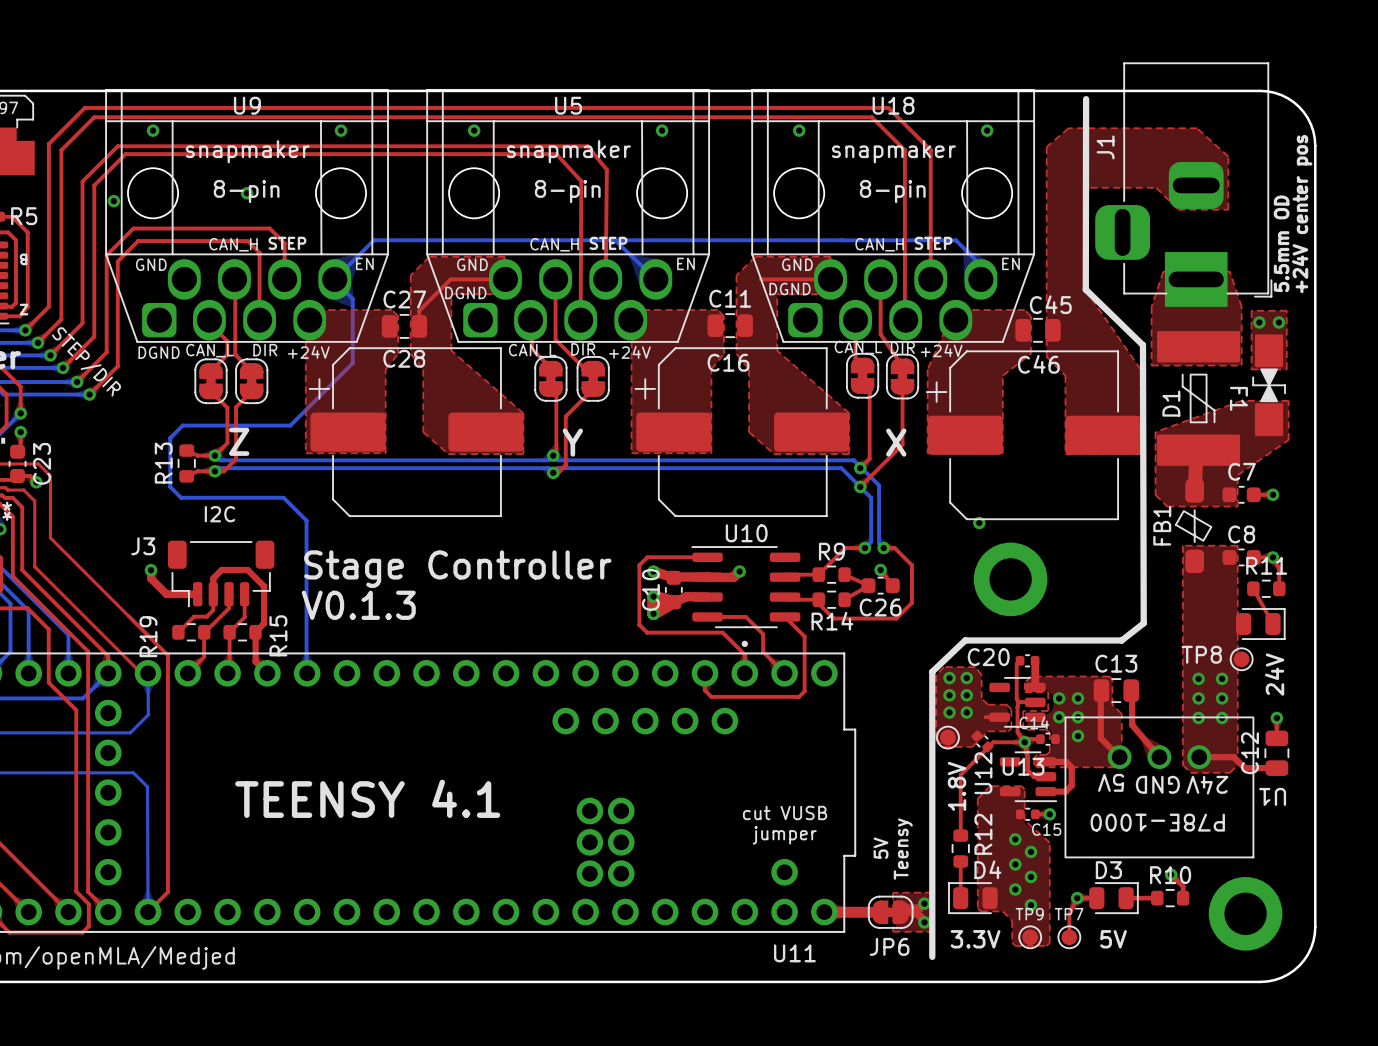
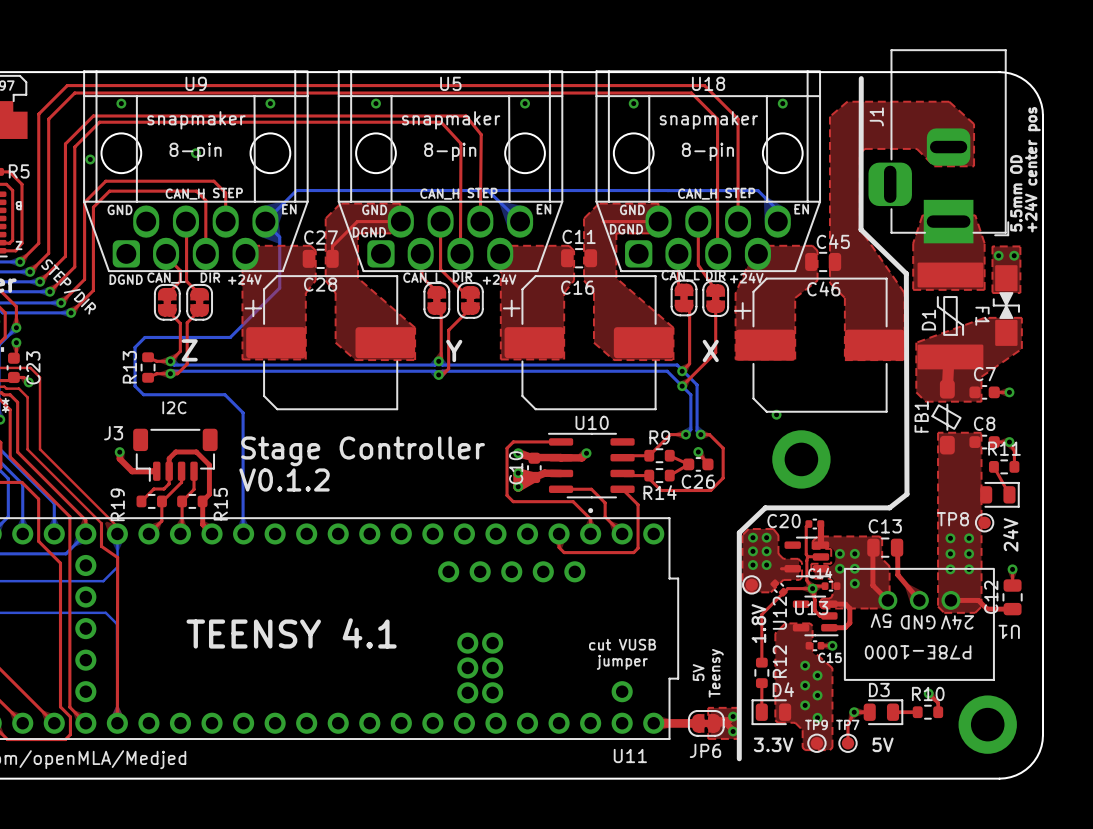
top track: (50, 537) (167, 655) (167, 892) (148, 912) -> (101, 523) (101, 546) (117, 557) (117, 723)
text: V0.1.3 (358, 605) -> V0.1.2 (284, 479)
top track: (127, 659) (141, 673) (148, 673) -> (40, 426) (40, 449) (117, 526) (117, 533)

